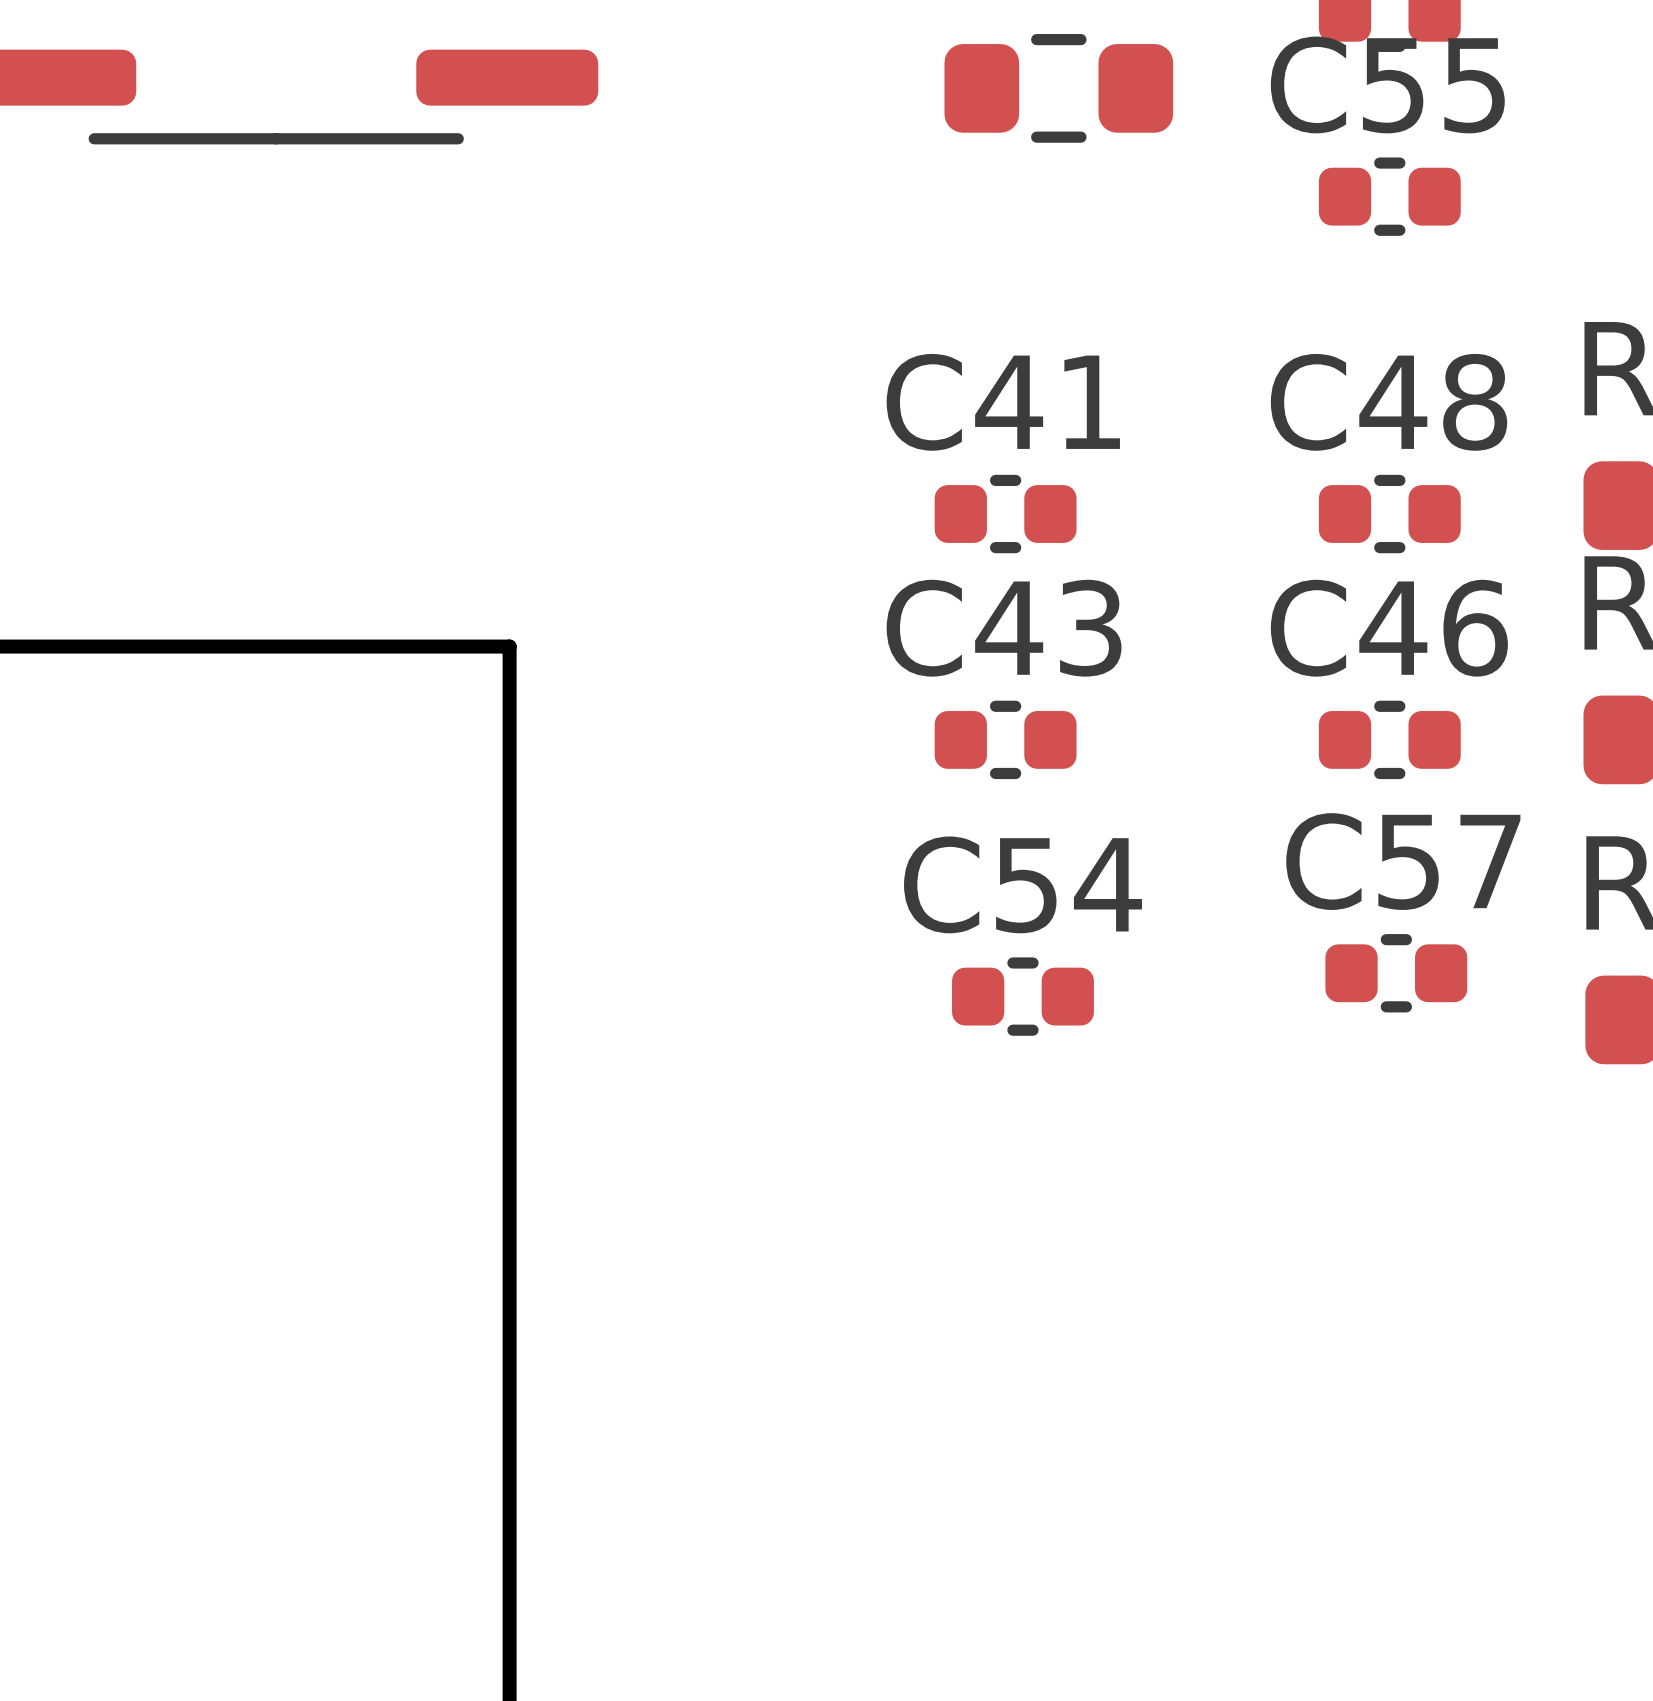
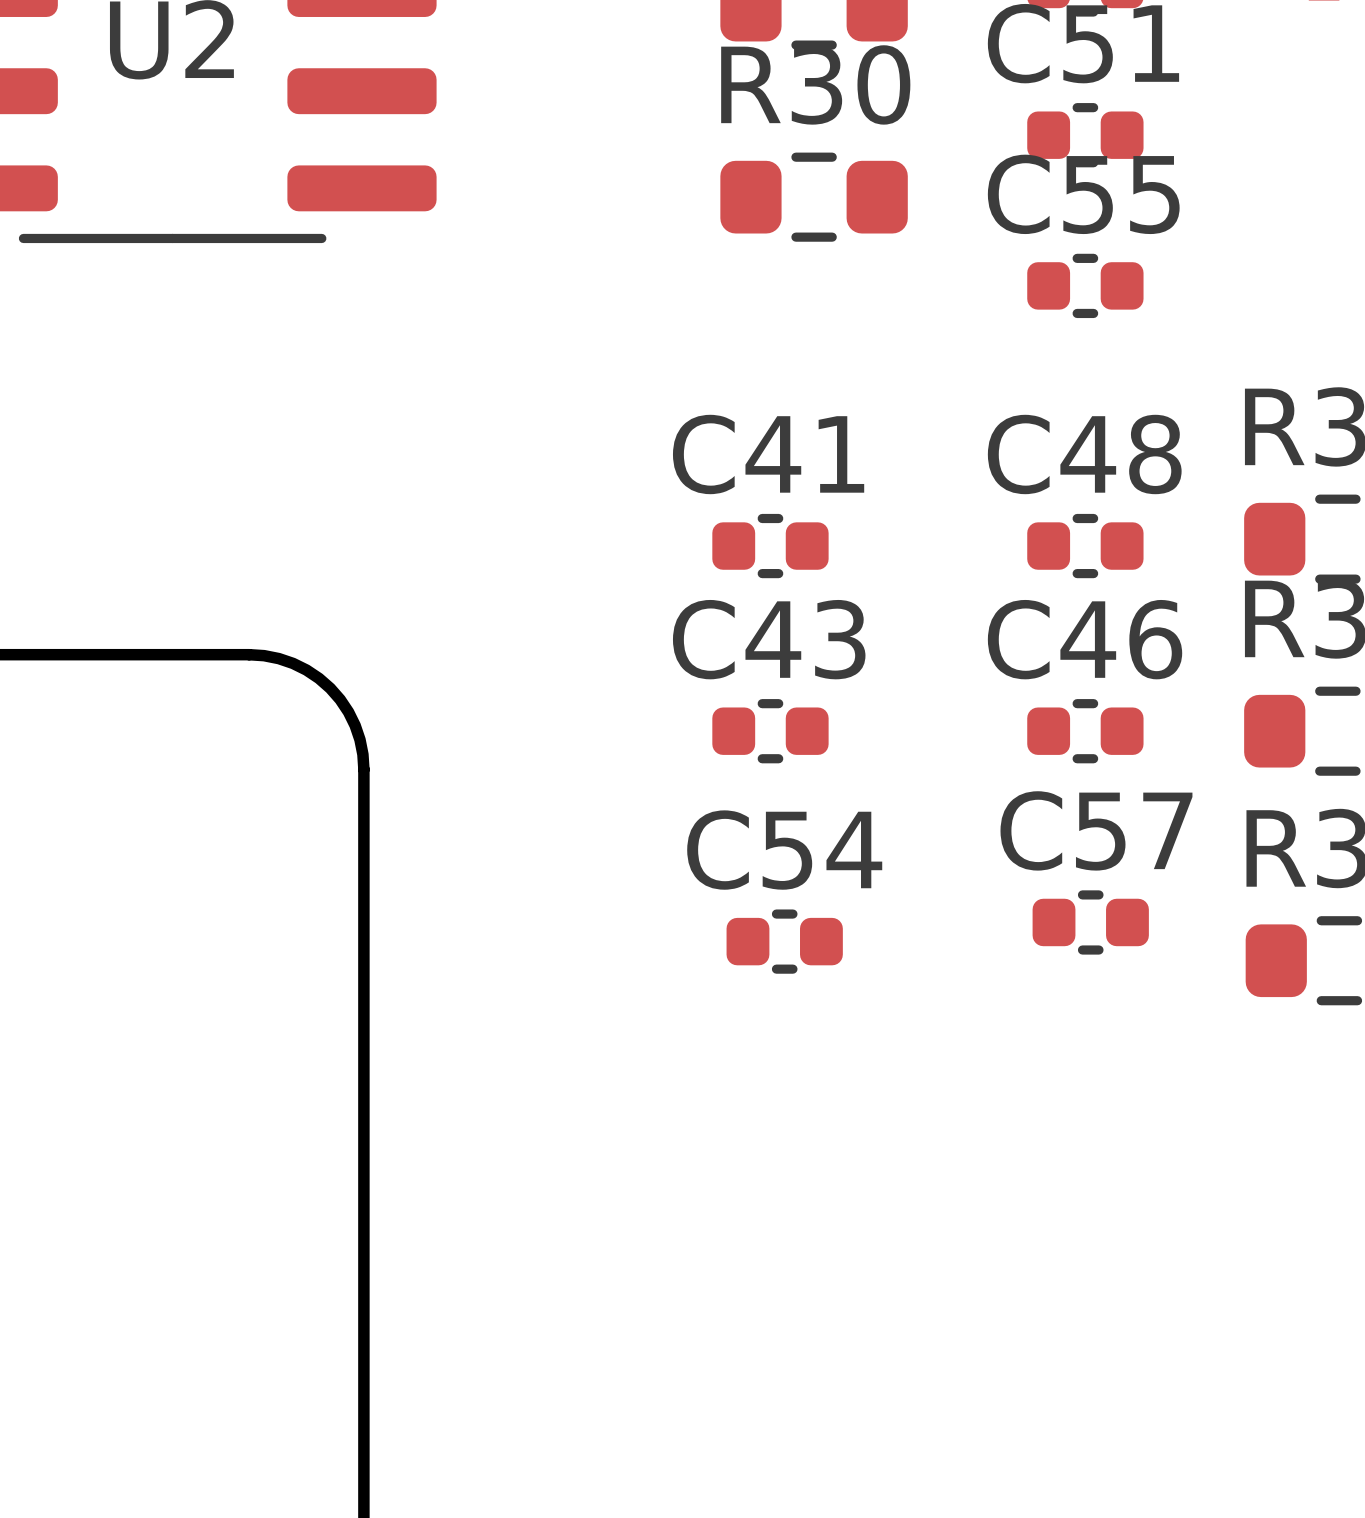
board edge: (369, 646) (509, 646) (509, 786) -> (249, 654) (278, 658) (293, 663) (306, 670) (330, 688) (348, 712) (355, 725) (359, 739) (363, 769)

